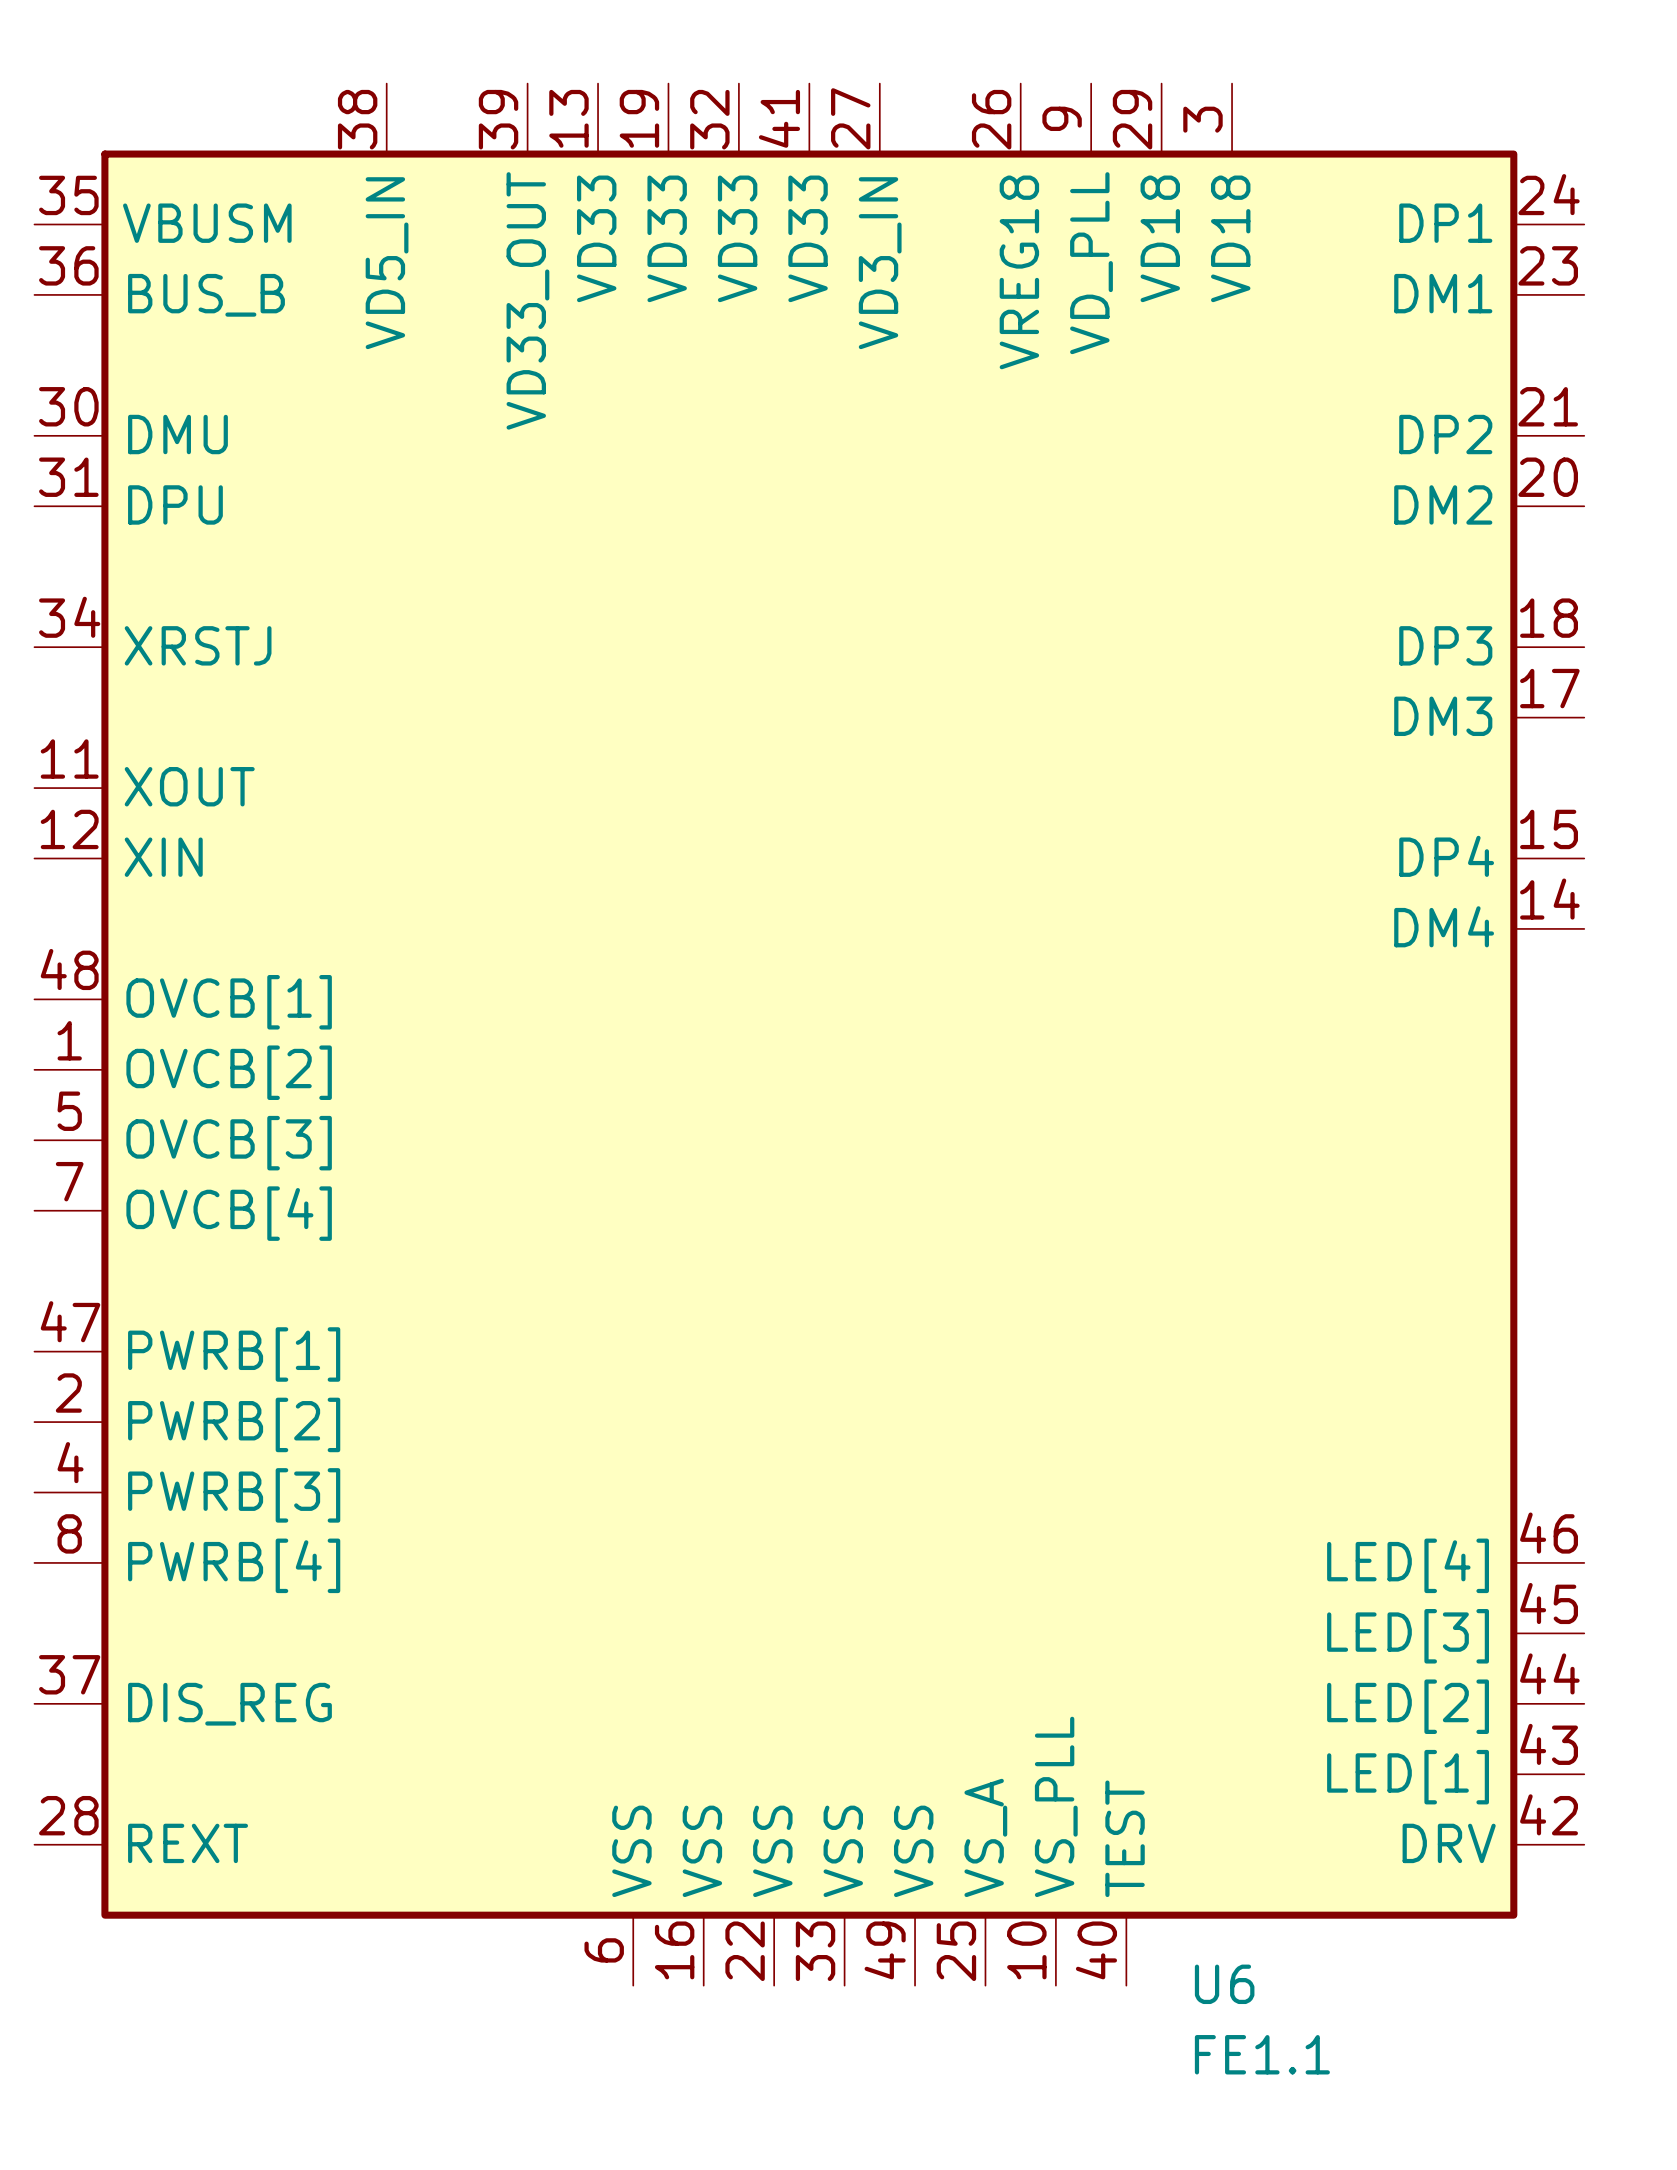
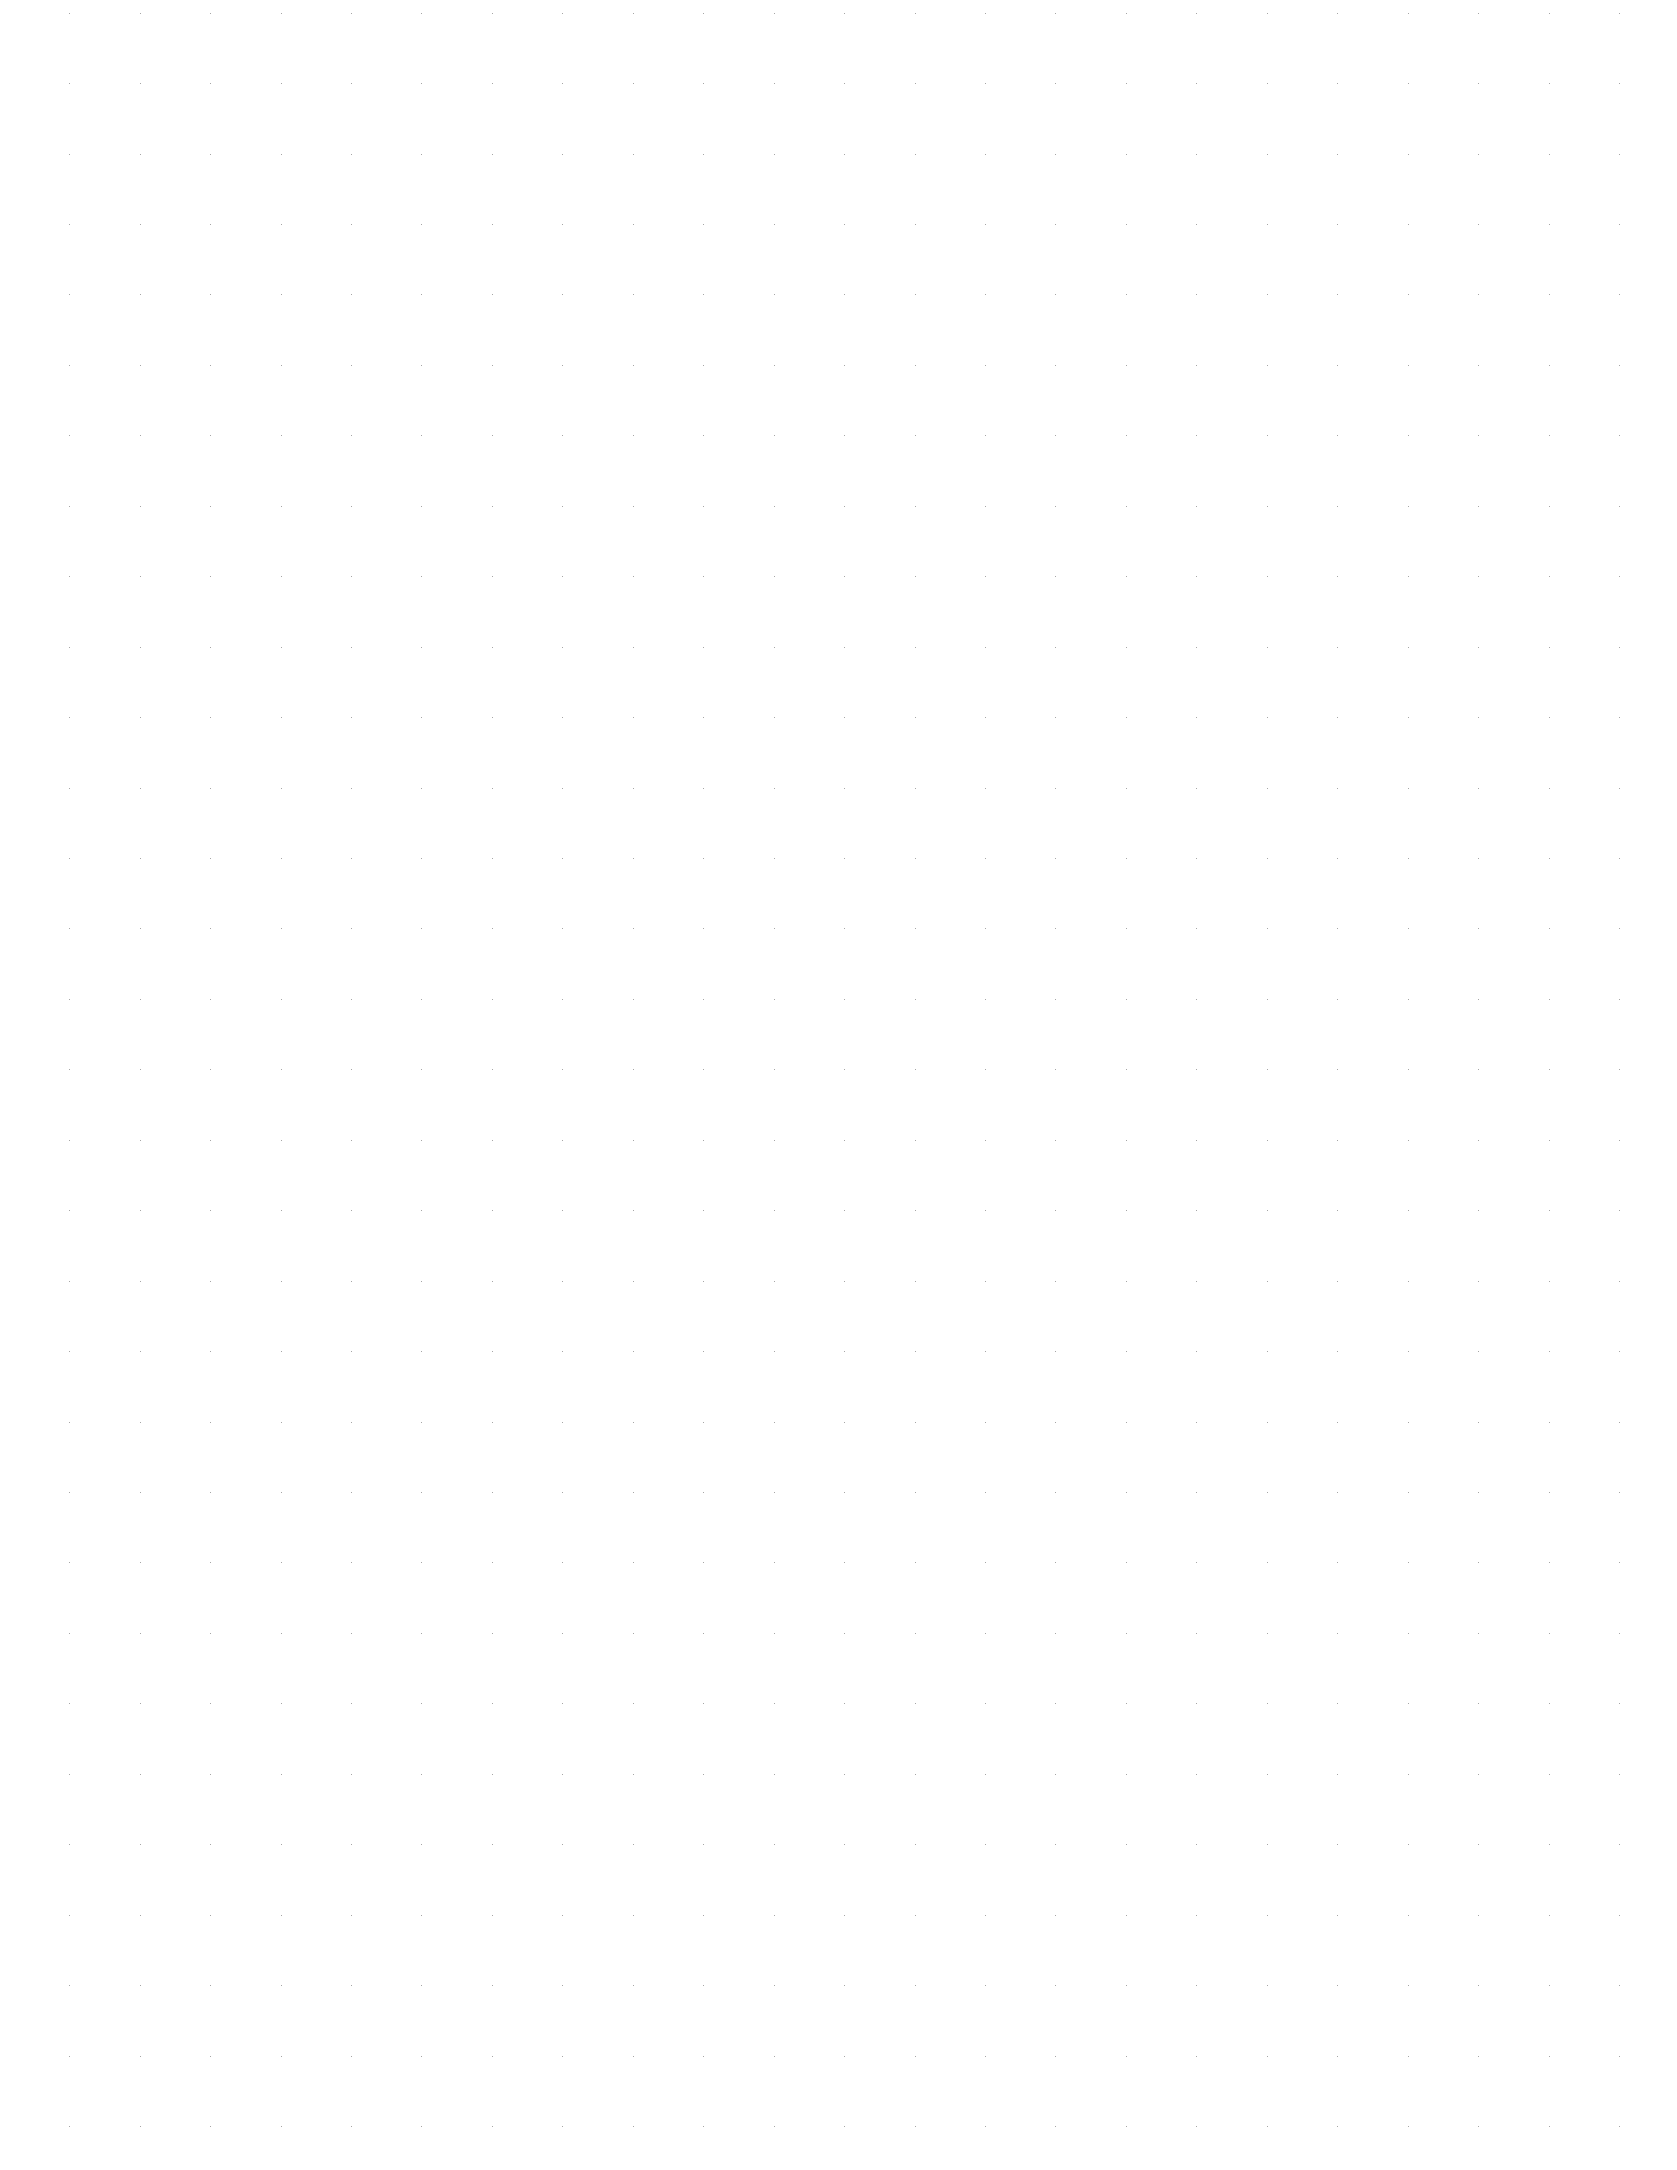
U6: FE1.1 (809, 1034) -> none

